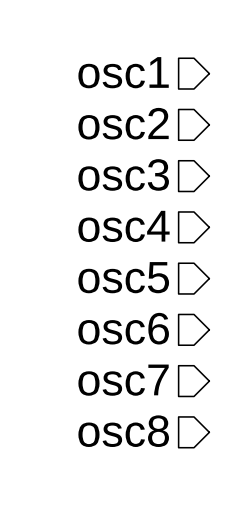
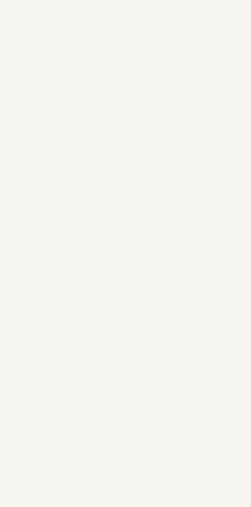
hierarchical label: osc1 (123, 72) -> none
hierarchical label: osc2 (123, 123) -> none
hierarchical label: osc3 (123, 174) -> none
hierarchical label: osc4 (124, 226) -> none
hierarchical label: osc5 (123, 277) -> none
hierarchical label: osc6 (123, 328) -> none
hierarchical label: osc7 (123, 380) -> none
hierarchical label: osc8 (123, 431) -> none

